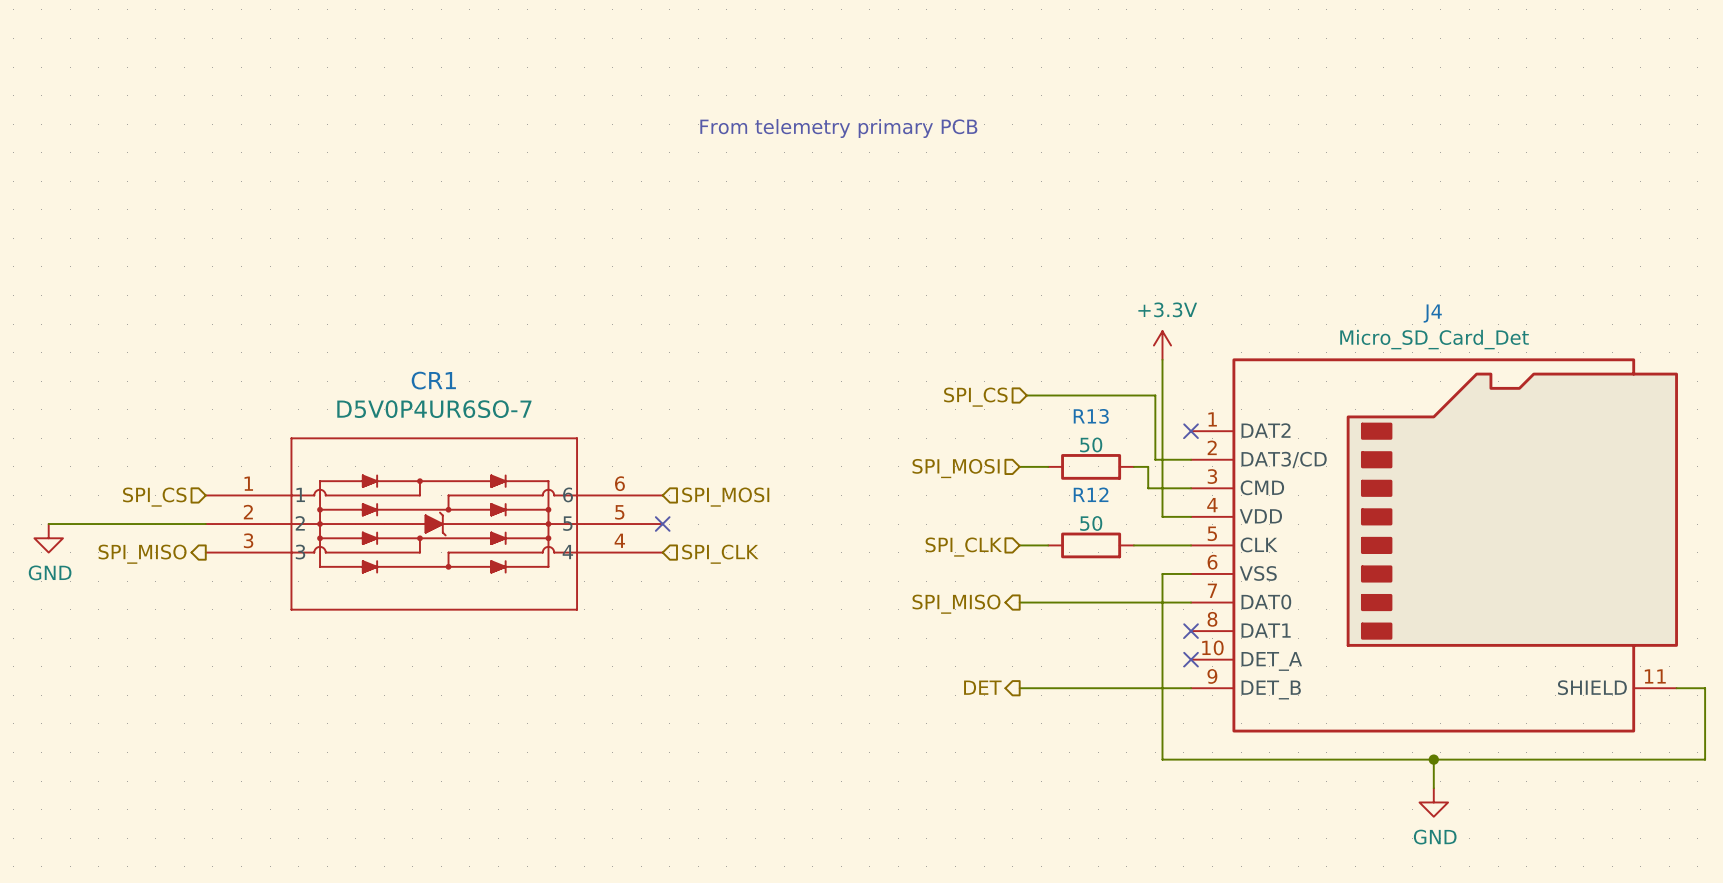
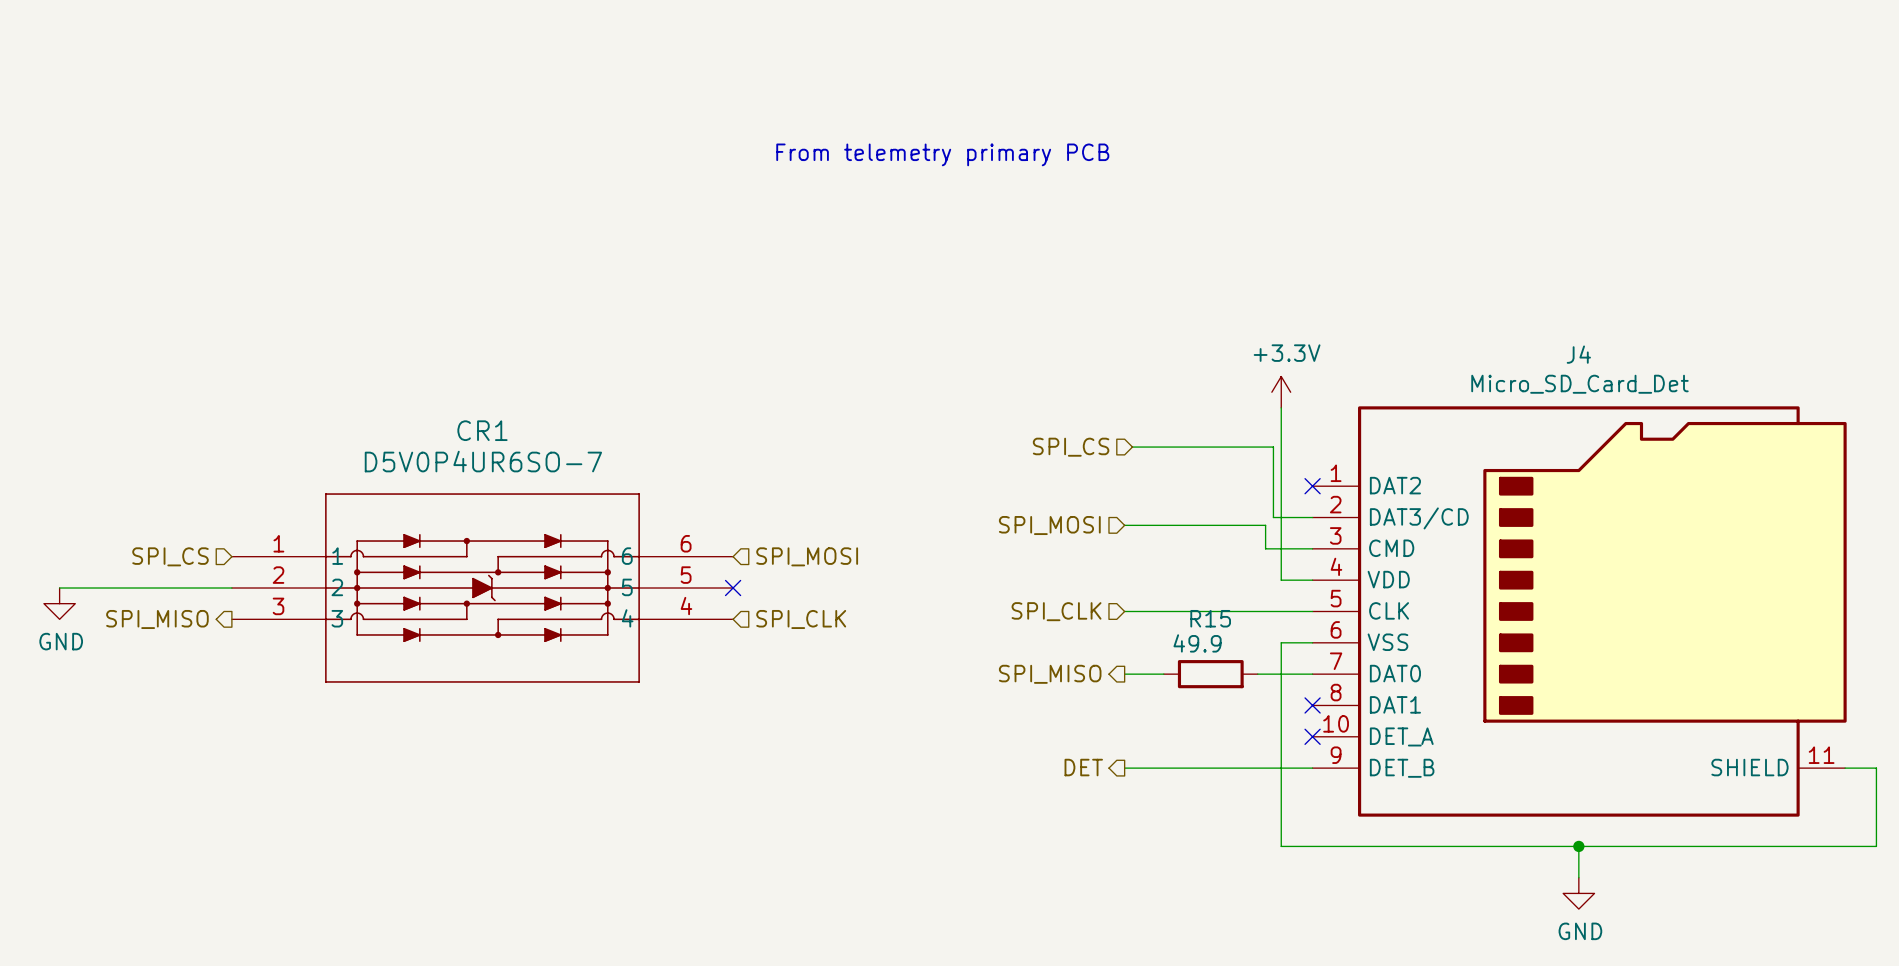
wire: none -> (1155, 525) (1249, 525)
R13: 50 (1091, 466) -> none
R12: 50 (1091, 545) -> none
wire: (1055, 602) (1141, 602) -> (1155, 611) (1249, 611)
R15: none -> 49.9 (1210, 674)

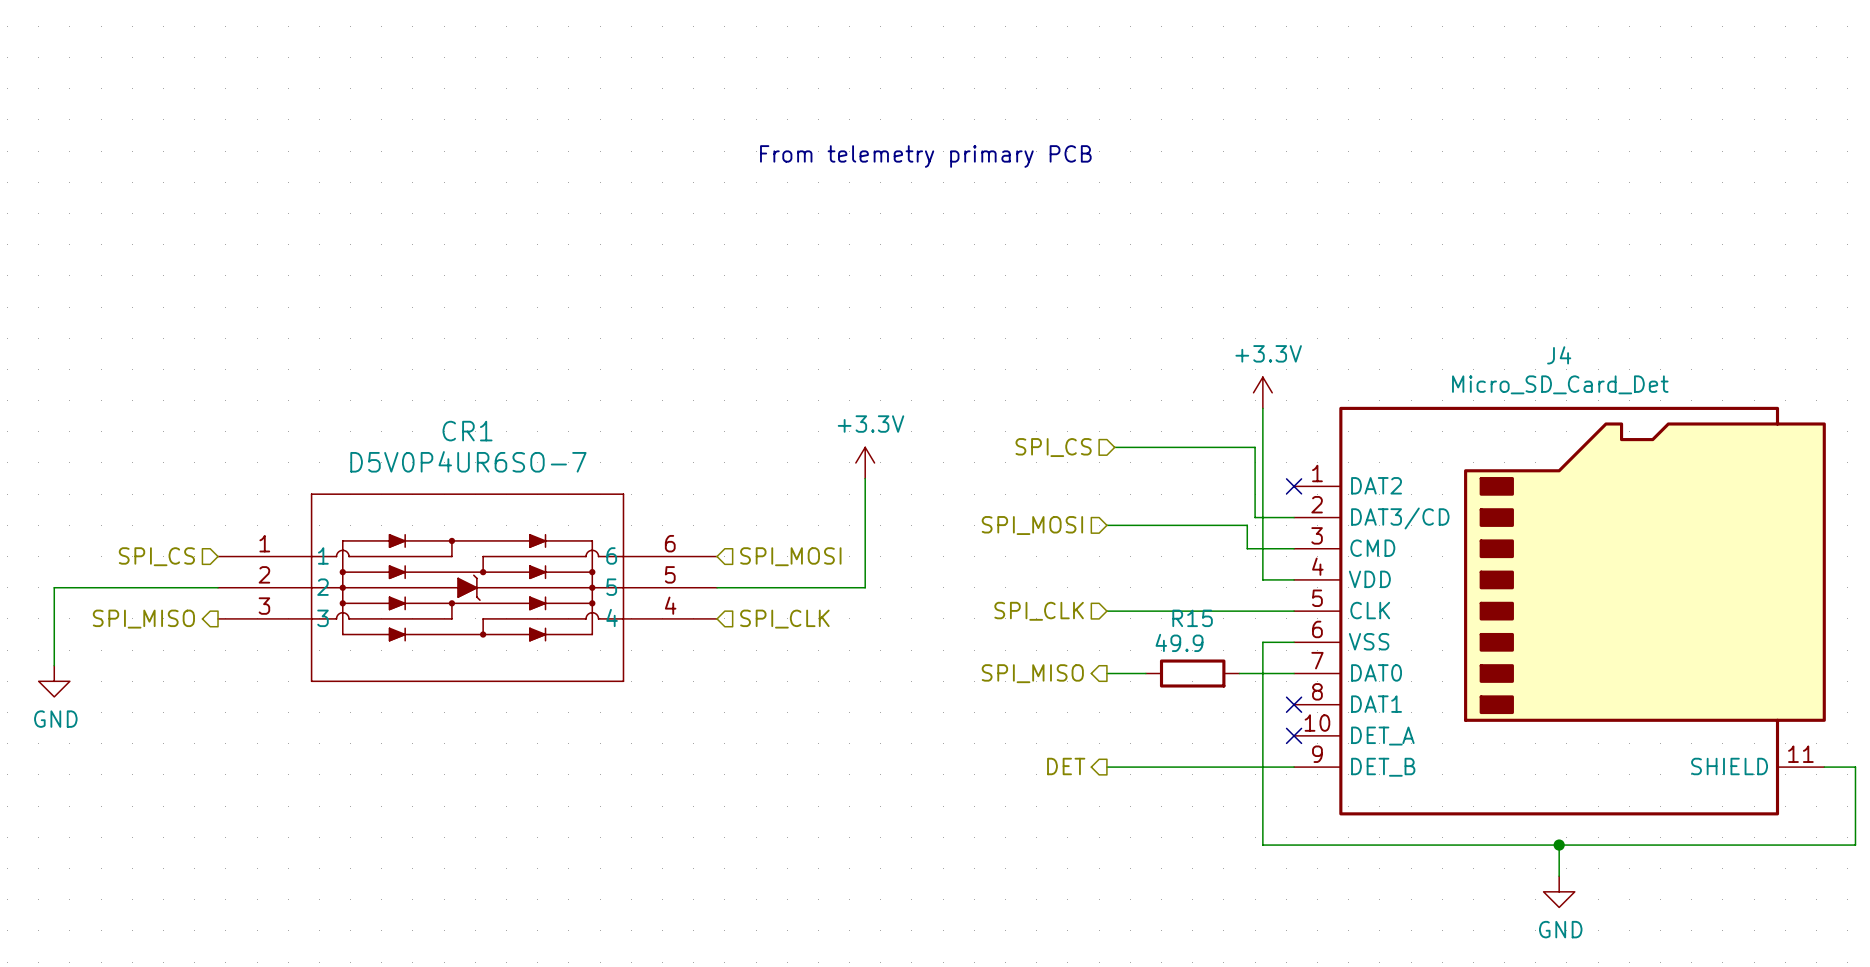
power symbol: none -> +3.3V (865, 462)
wire: none -> (865, 478) (865, 587) (717, 587)
wire: (59, 588) (67, 588) -> (54, 665) (54, 587)
no-connect mark: (733, 588) -> none
power symbol position: GND (59, 603) -> GND (54, 681)

